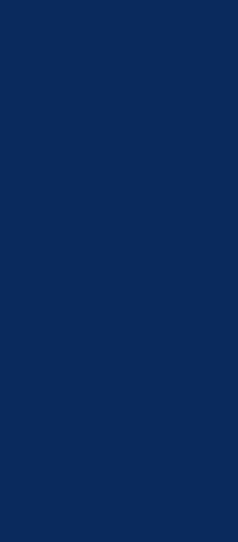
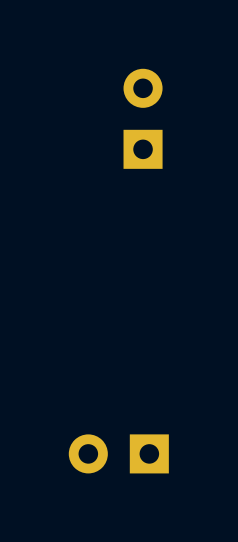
part: none -> (143, 118)
part: none -> (118, 453)

